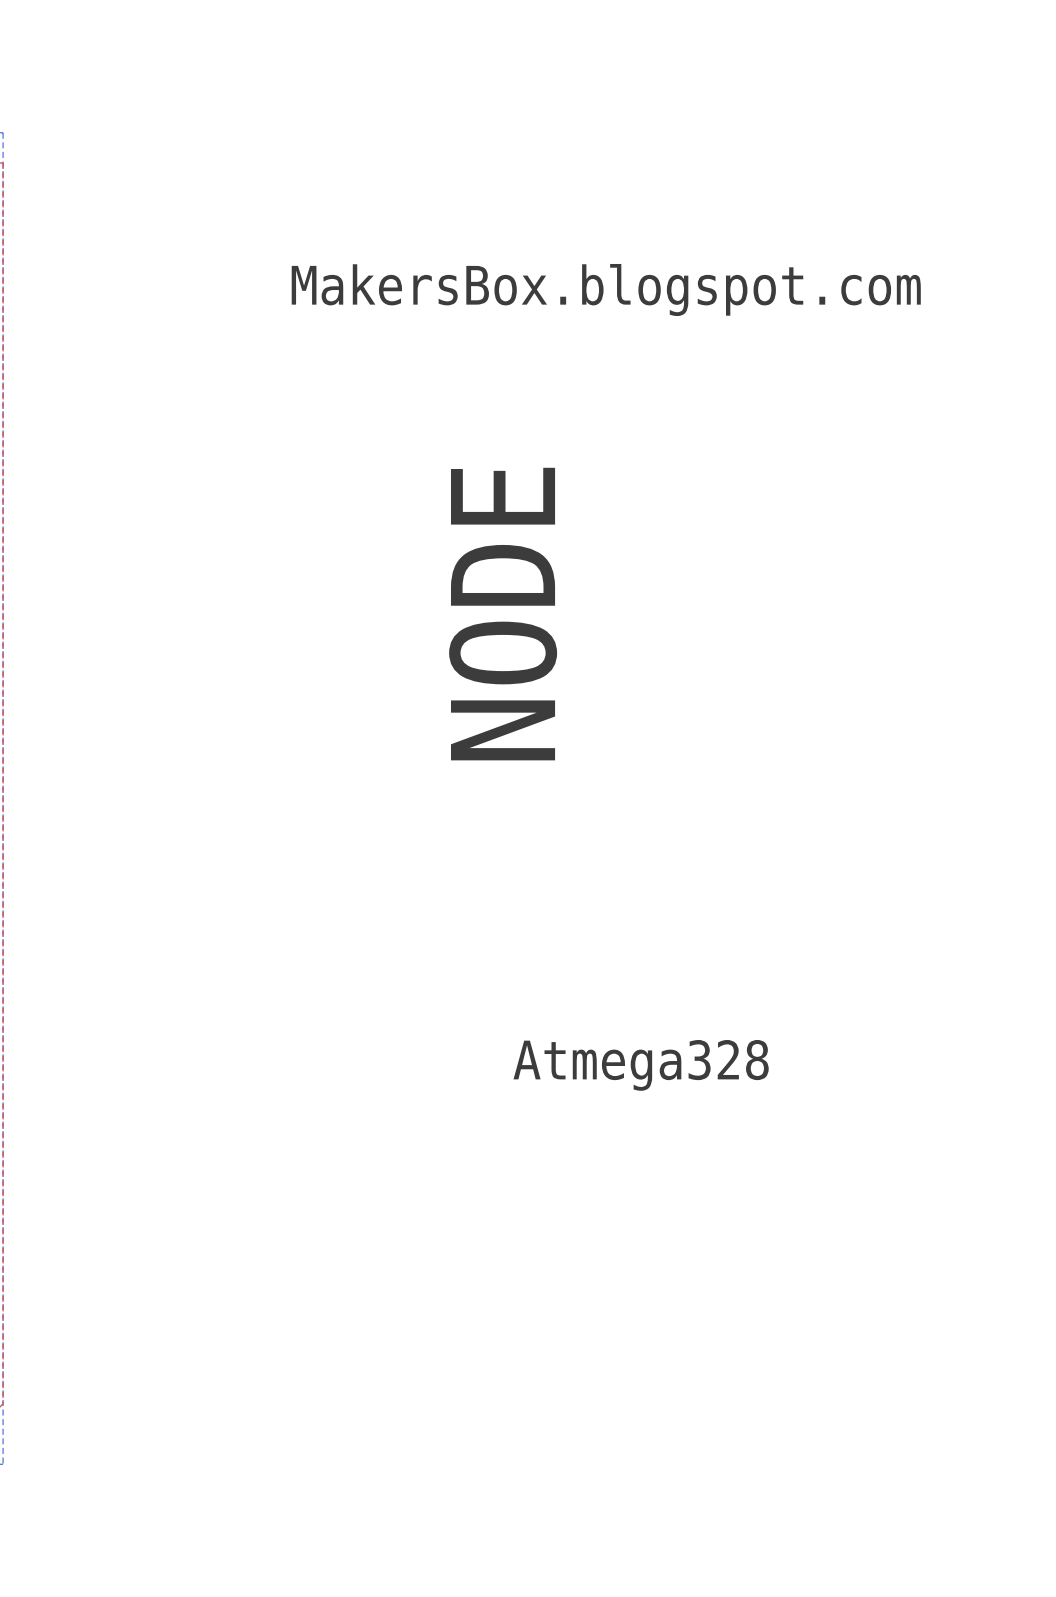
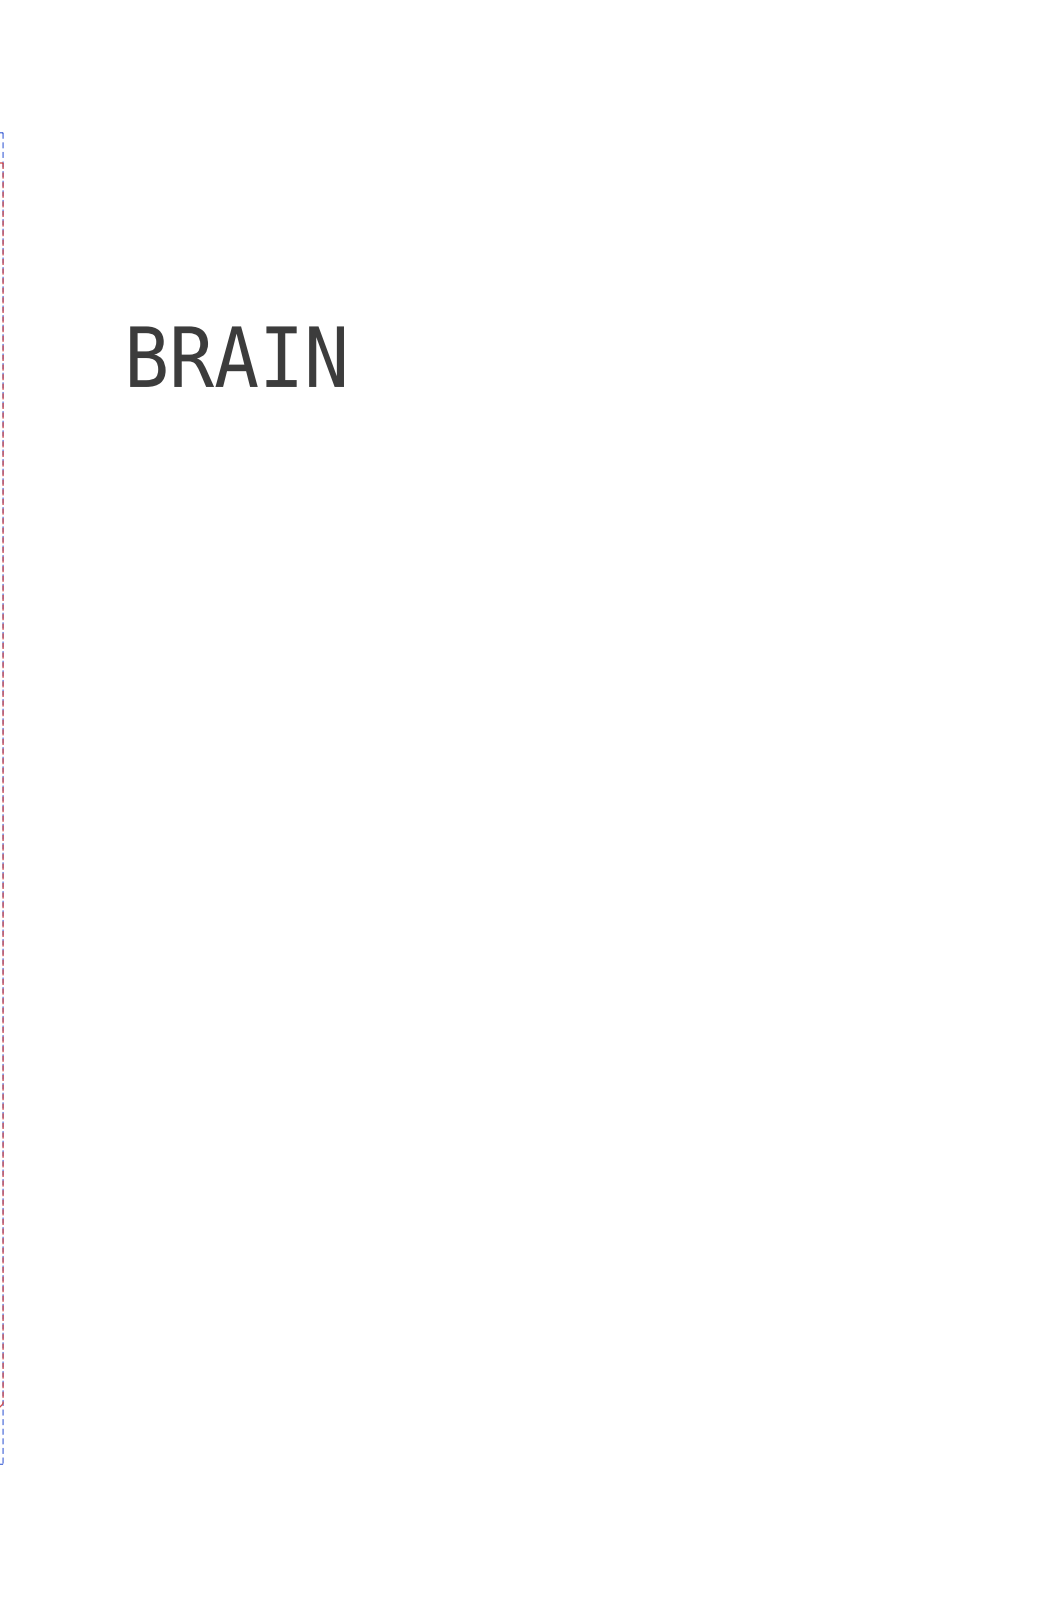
text: MakersBox.blogspot.com (606, 290) -> none
text: none -> BRAIN (237, 356)
text: NODE (503, 614) -> none
text: Atmega328 (641, 1065) -> none

